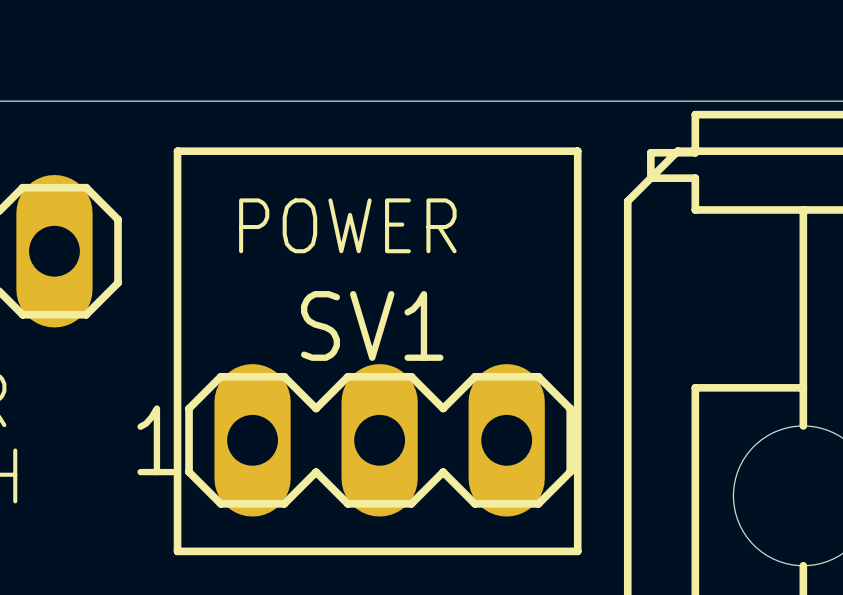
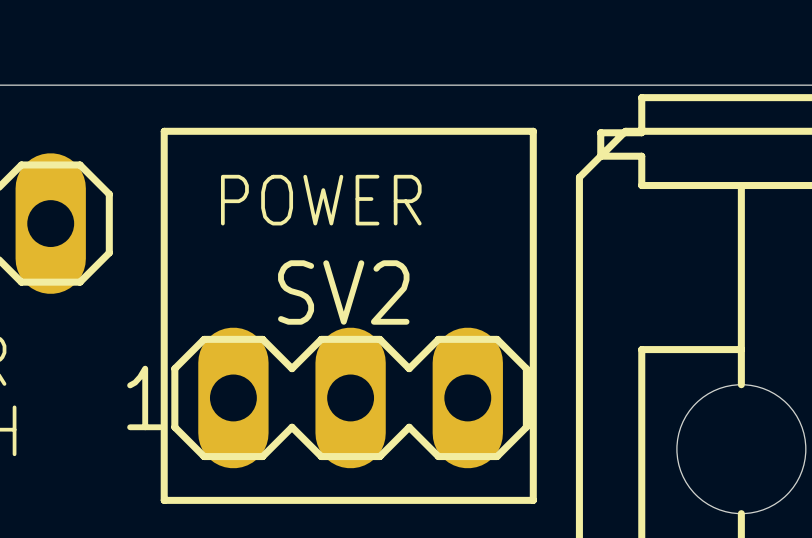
SV1 name: SV1 (372, 325) -> SV2 (343, 292)

